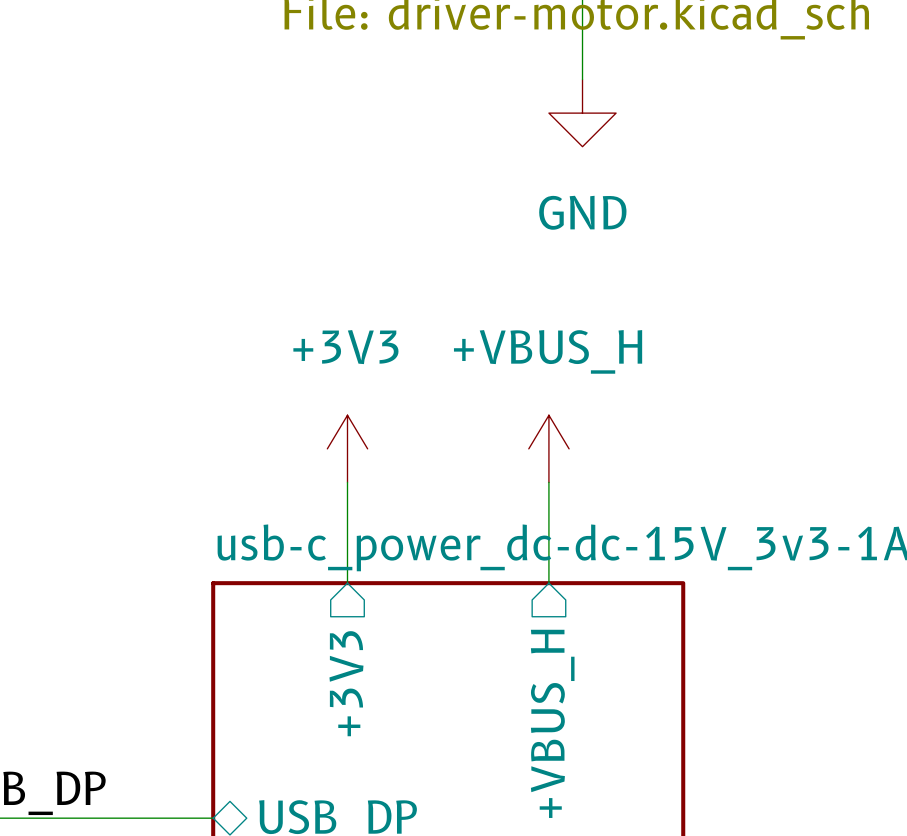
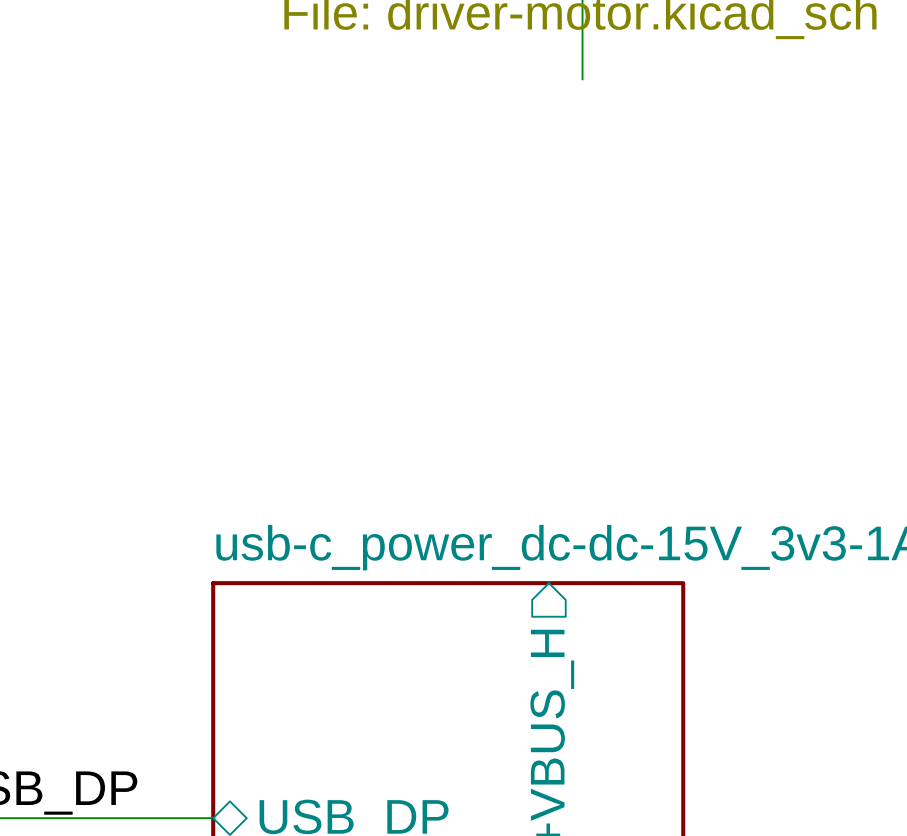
power symbol: GND (582, 113) -> none
power symbol: +3V3 (347, 448) -> none
power symbol: +VBUS_H (548, 448) -> none
wire: (347, 482) (347, 583) -> none
wire: (548, 482) (548, 583) -> none
sheet pin: +3V3 (346, 683) -> none

